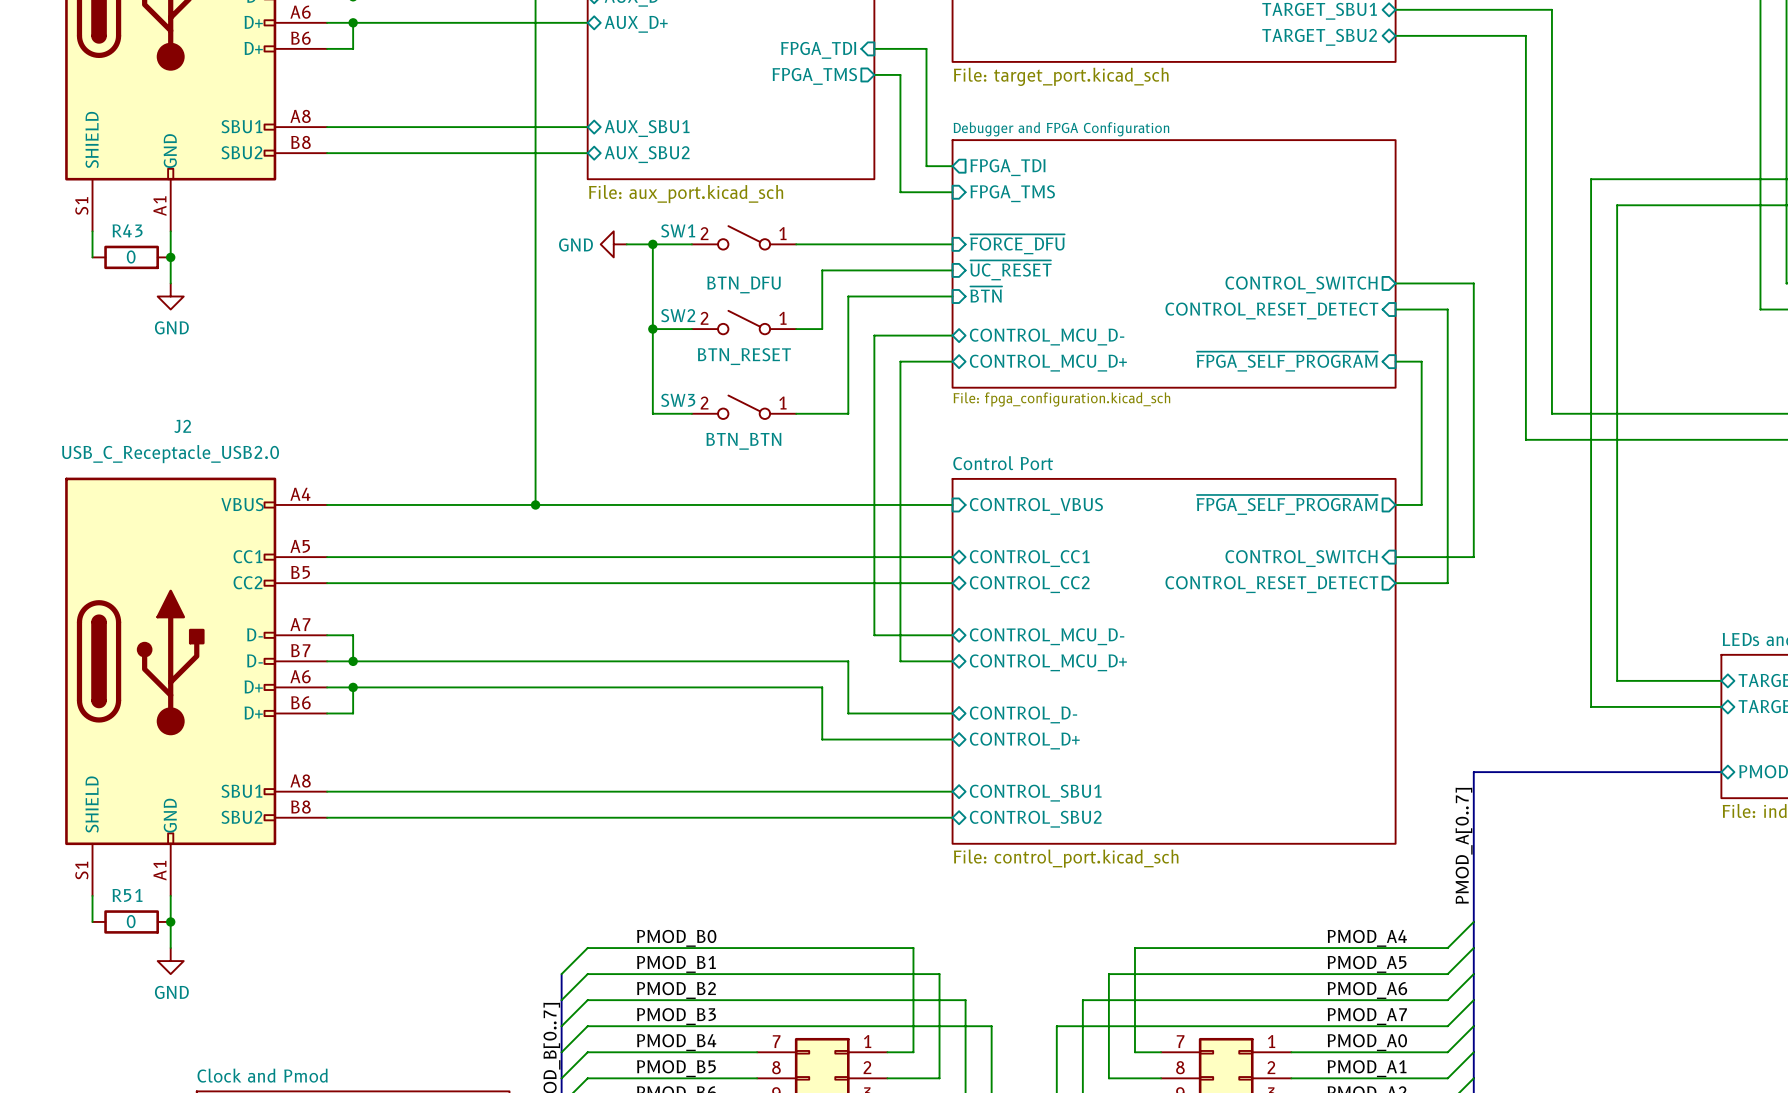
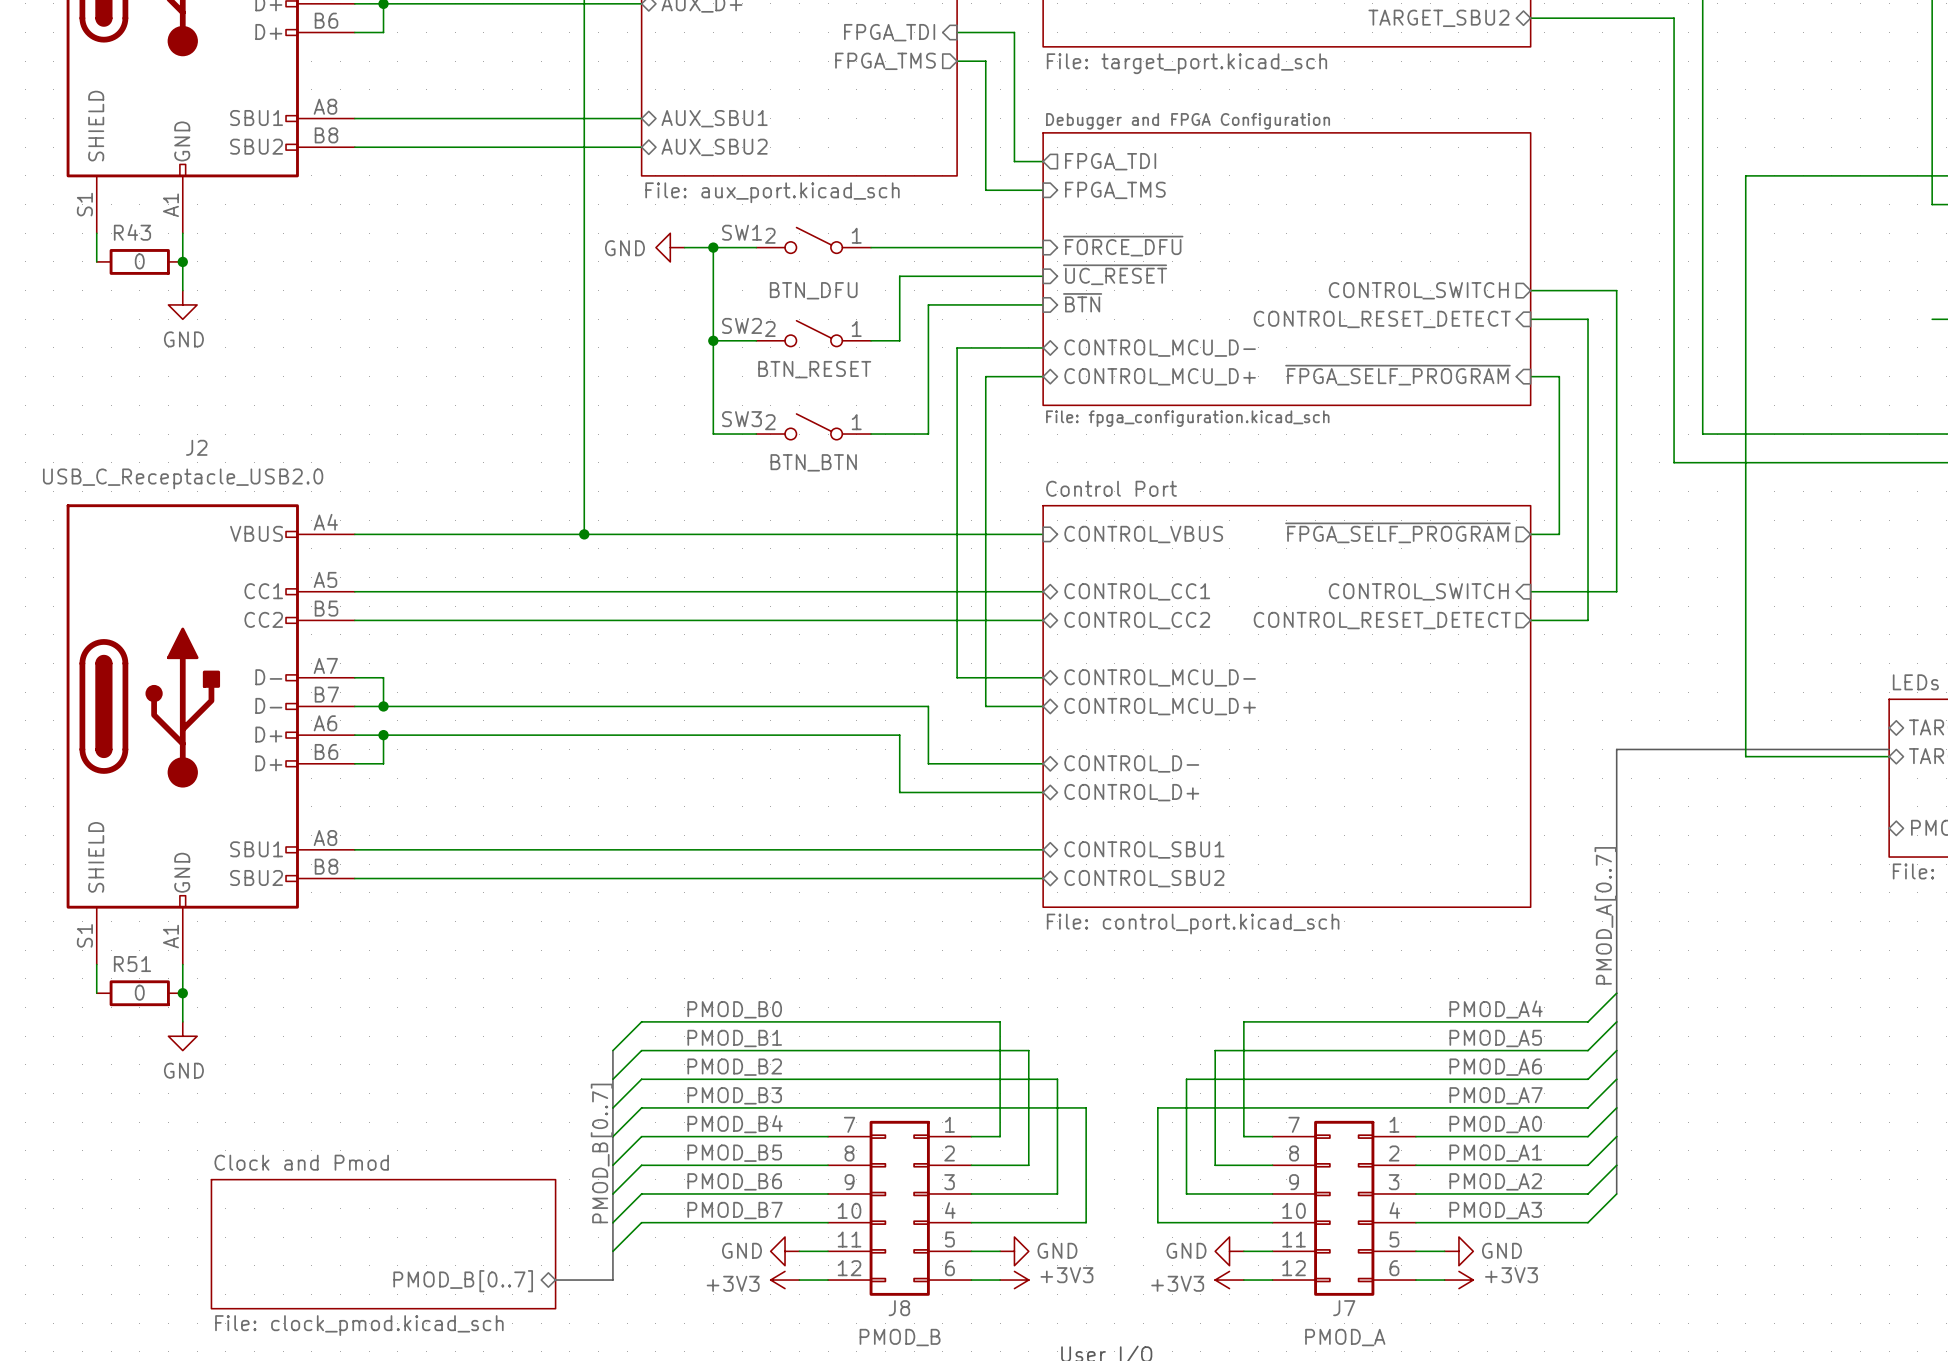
wire: (1760, 309) (1760, 205) (1617, 205) (1617, 680) (1721, 680) -> none
bus: (1473, 772) (1721, 772) -> (1616, 828) (1616, 749) (1889, 749)

